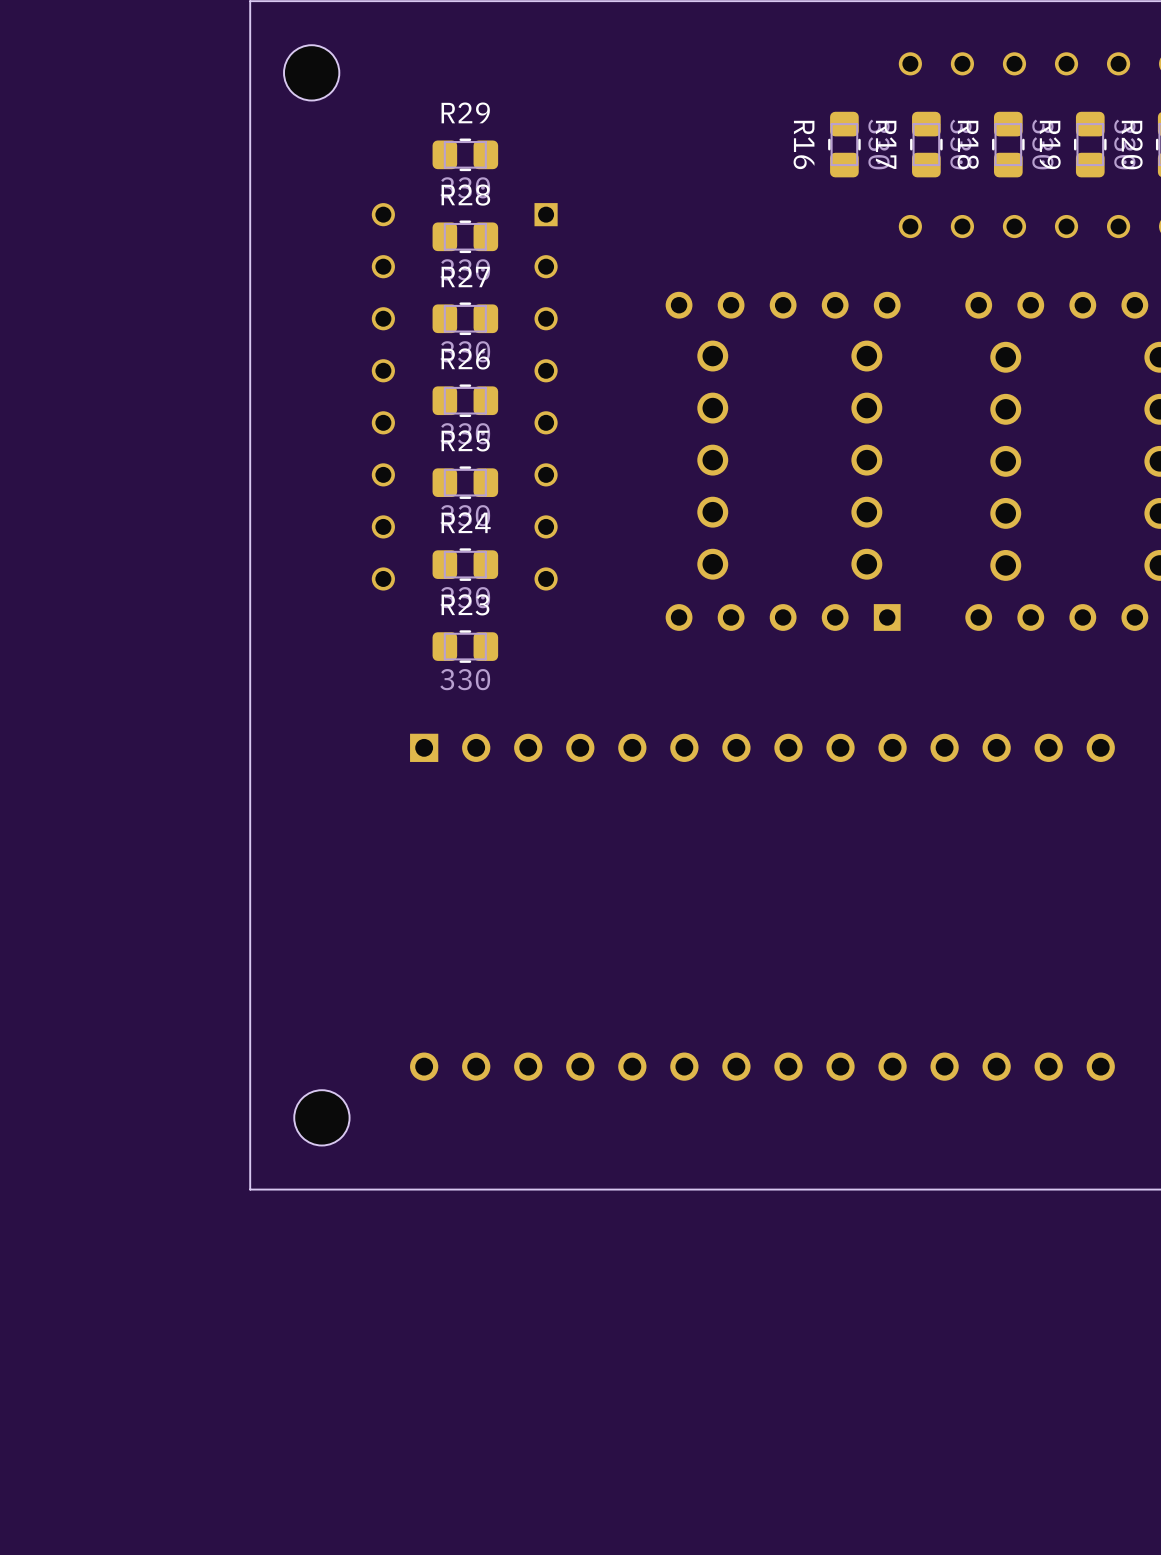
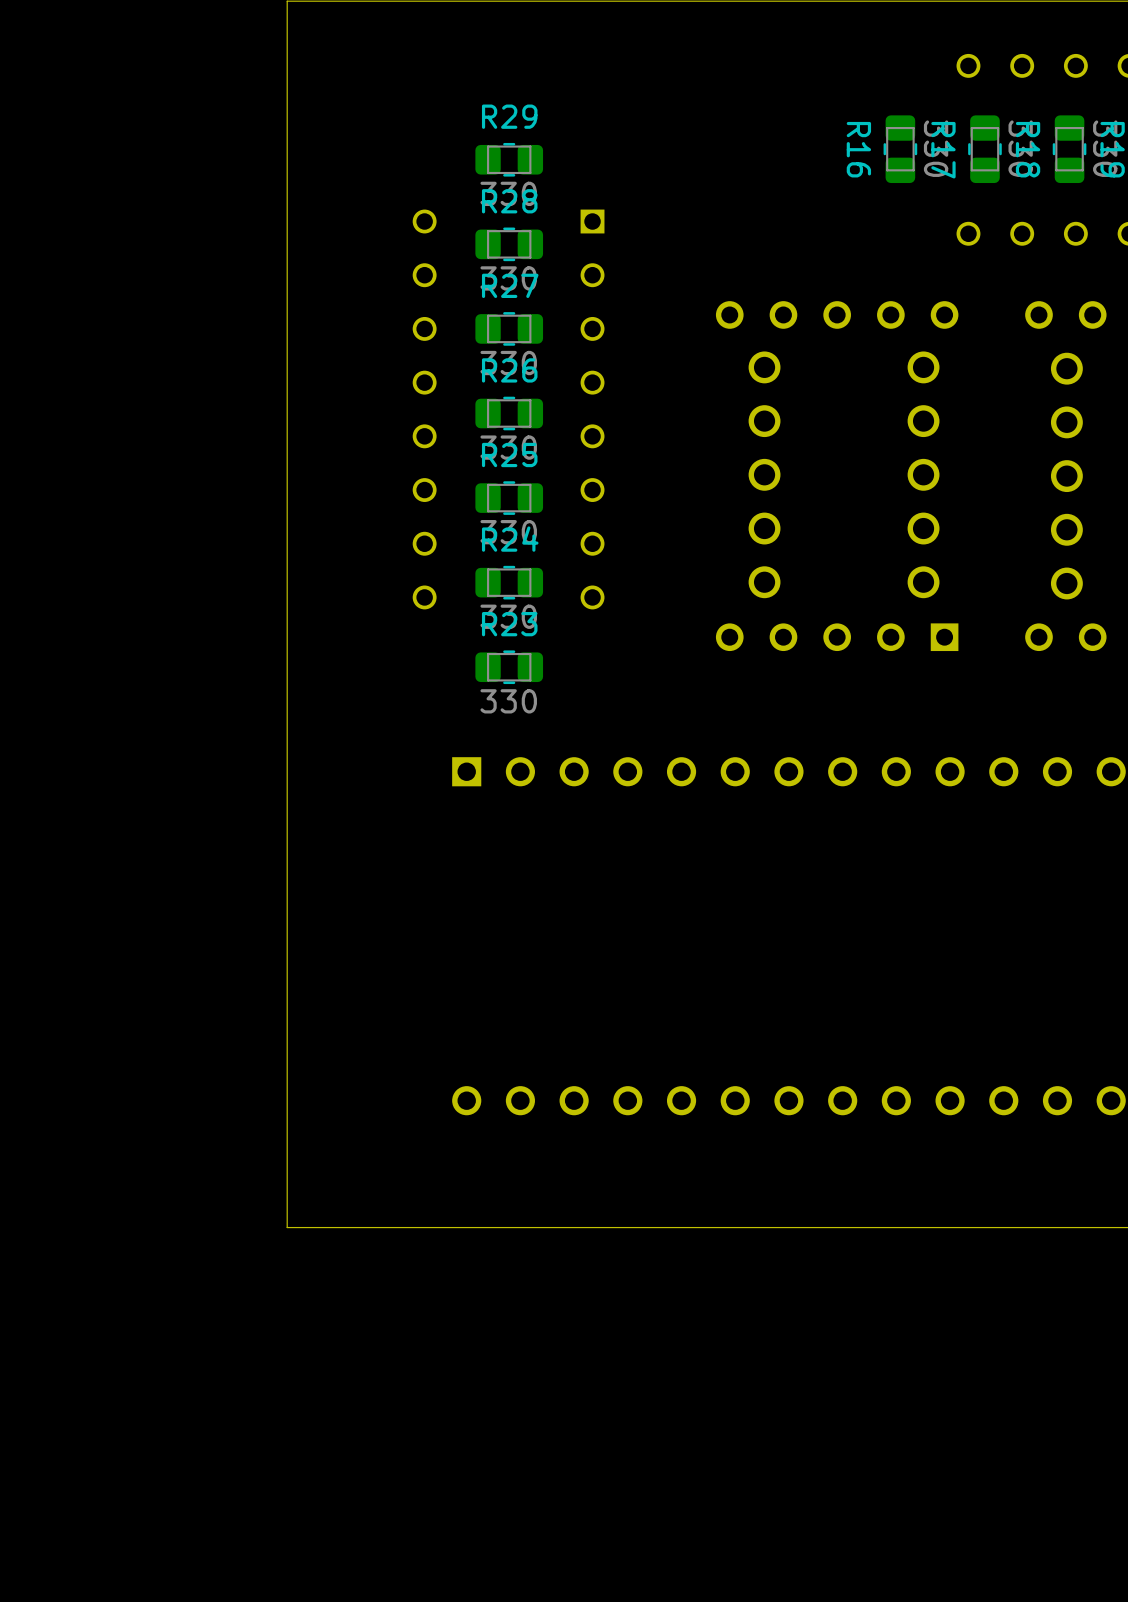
part: (311, 72) -> none
part: (321, 1117) -> none

